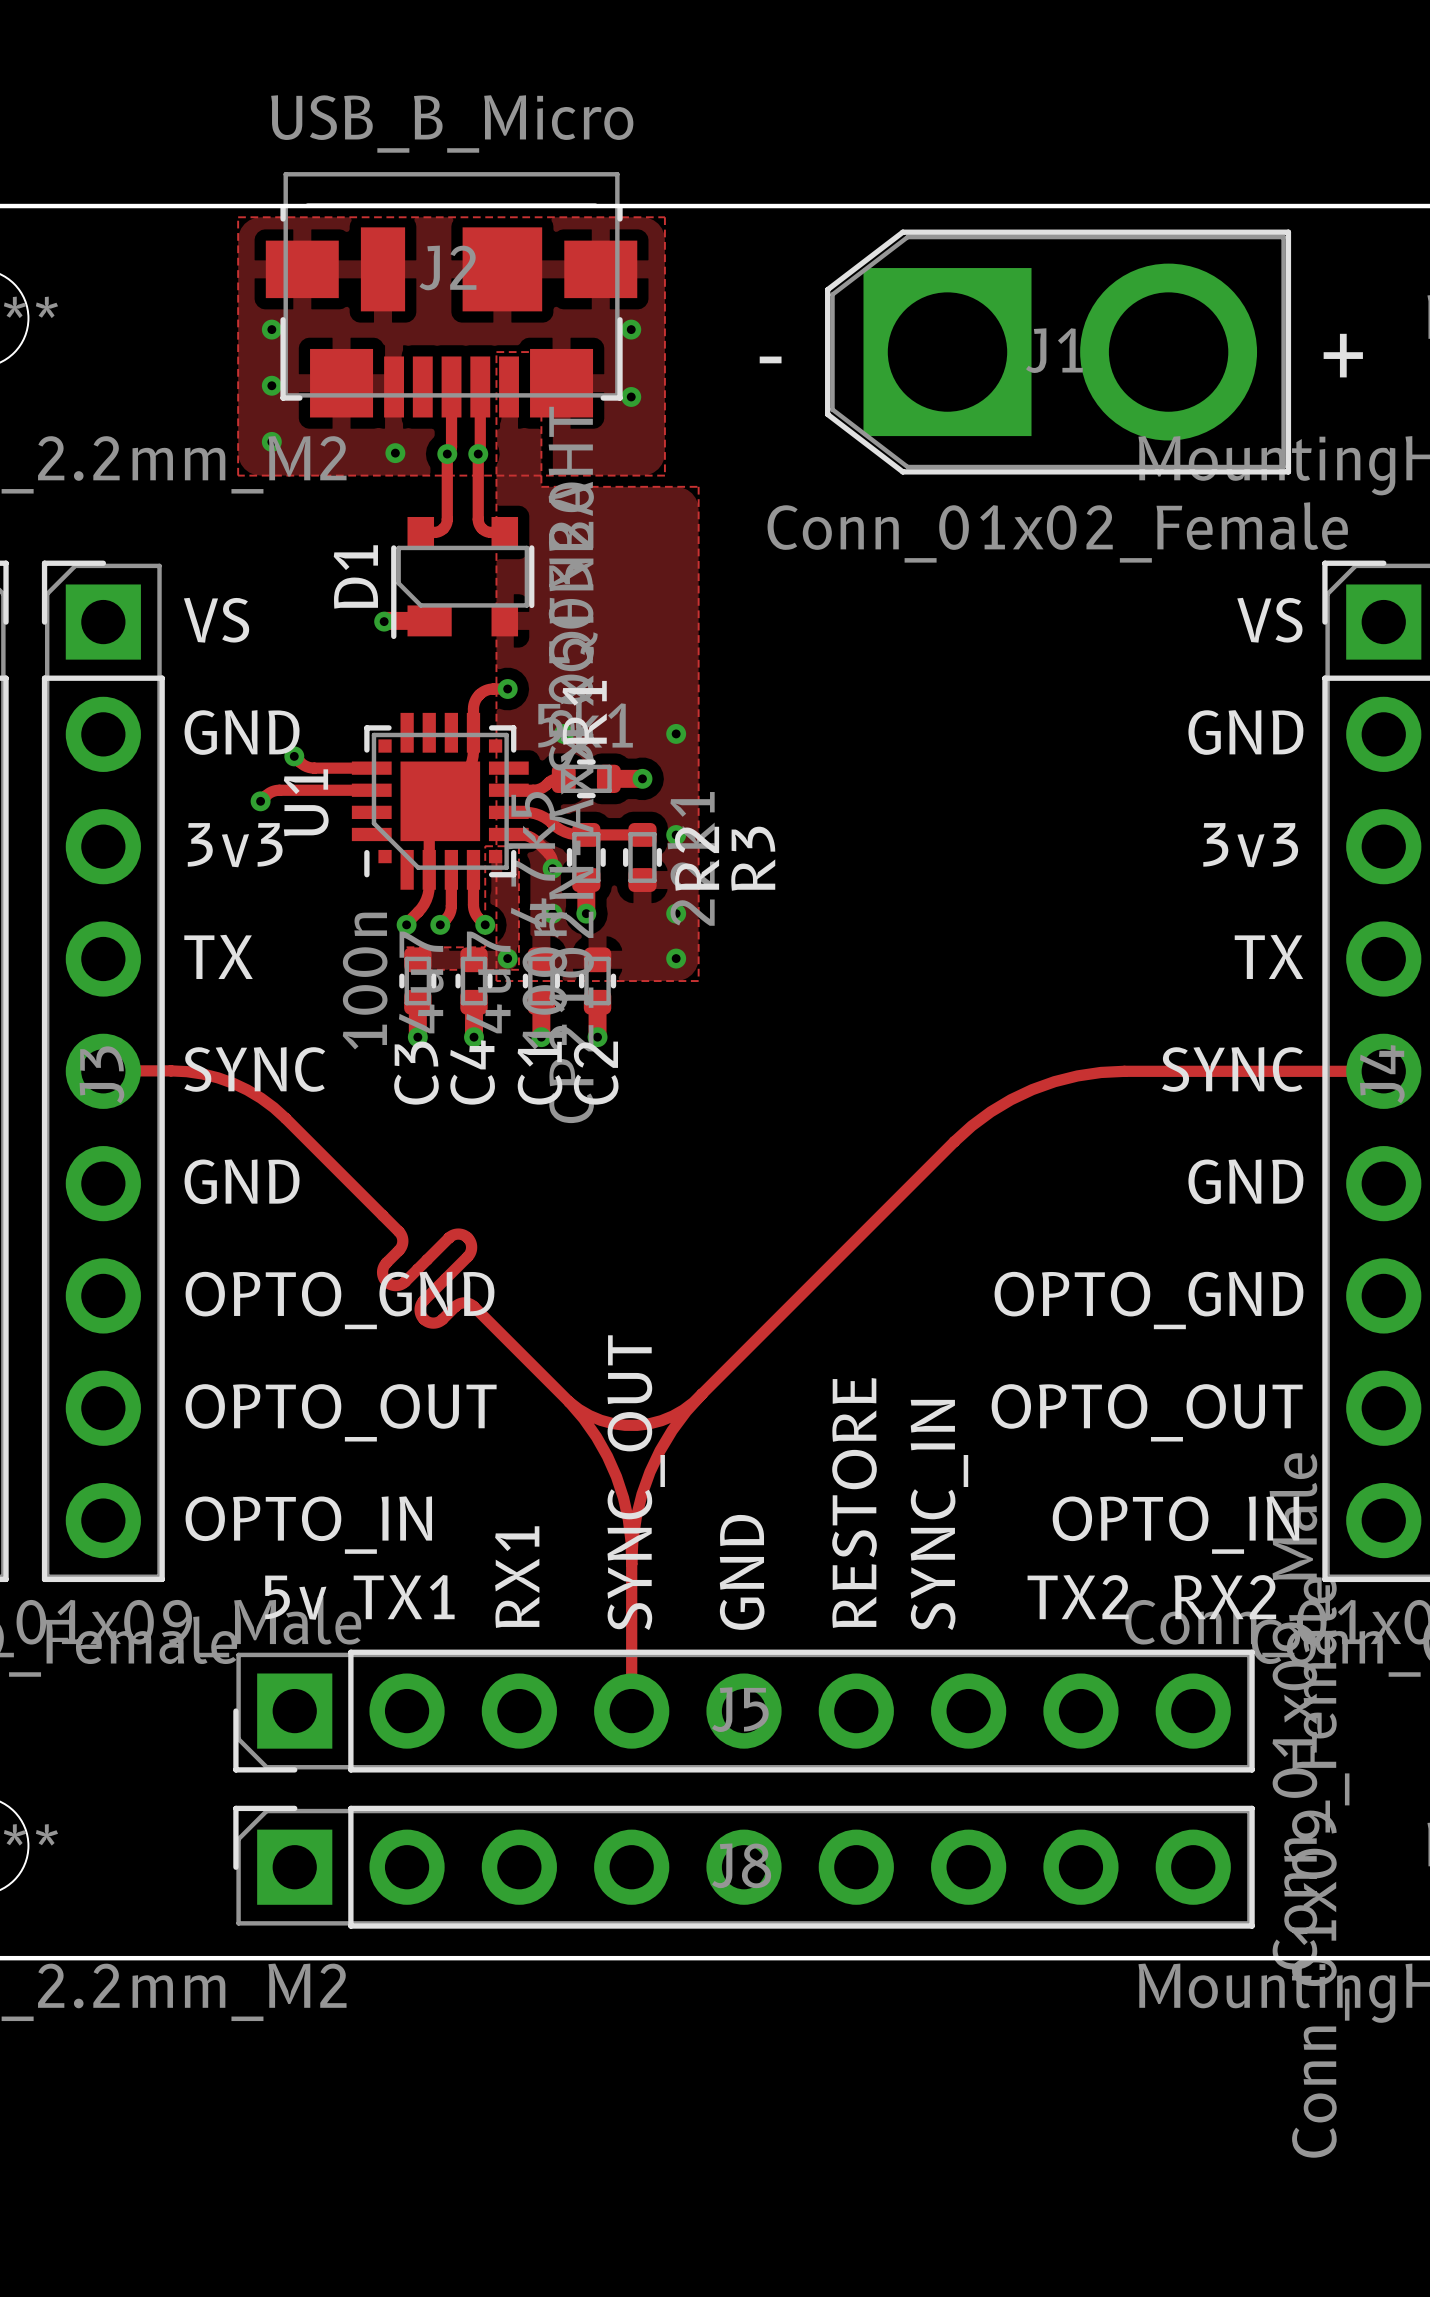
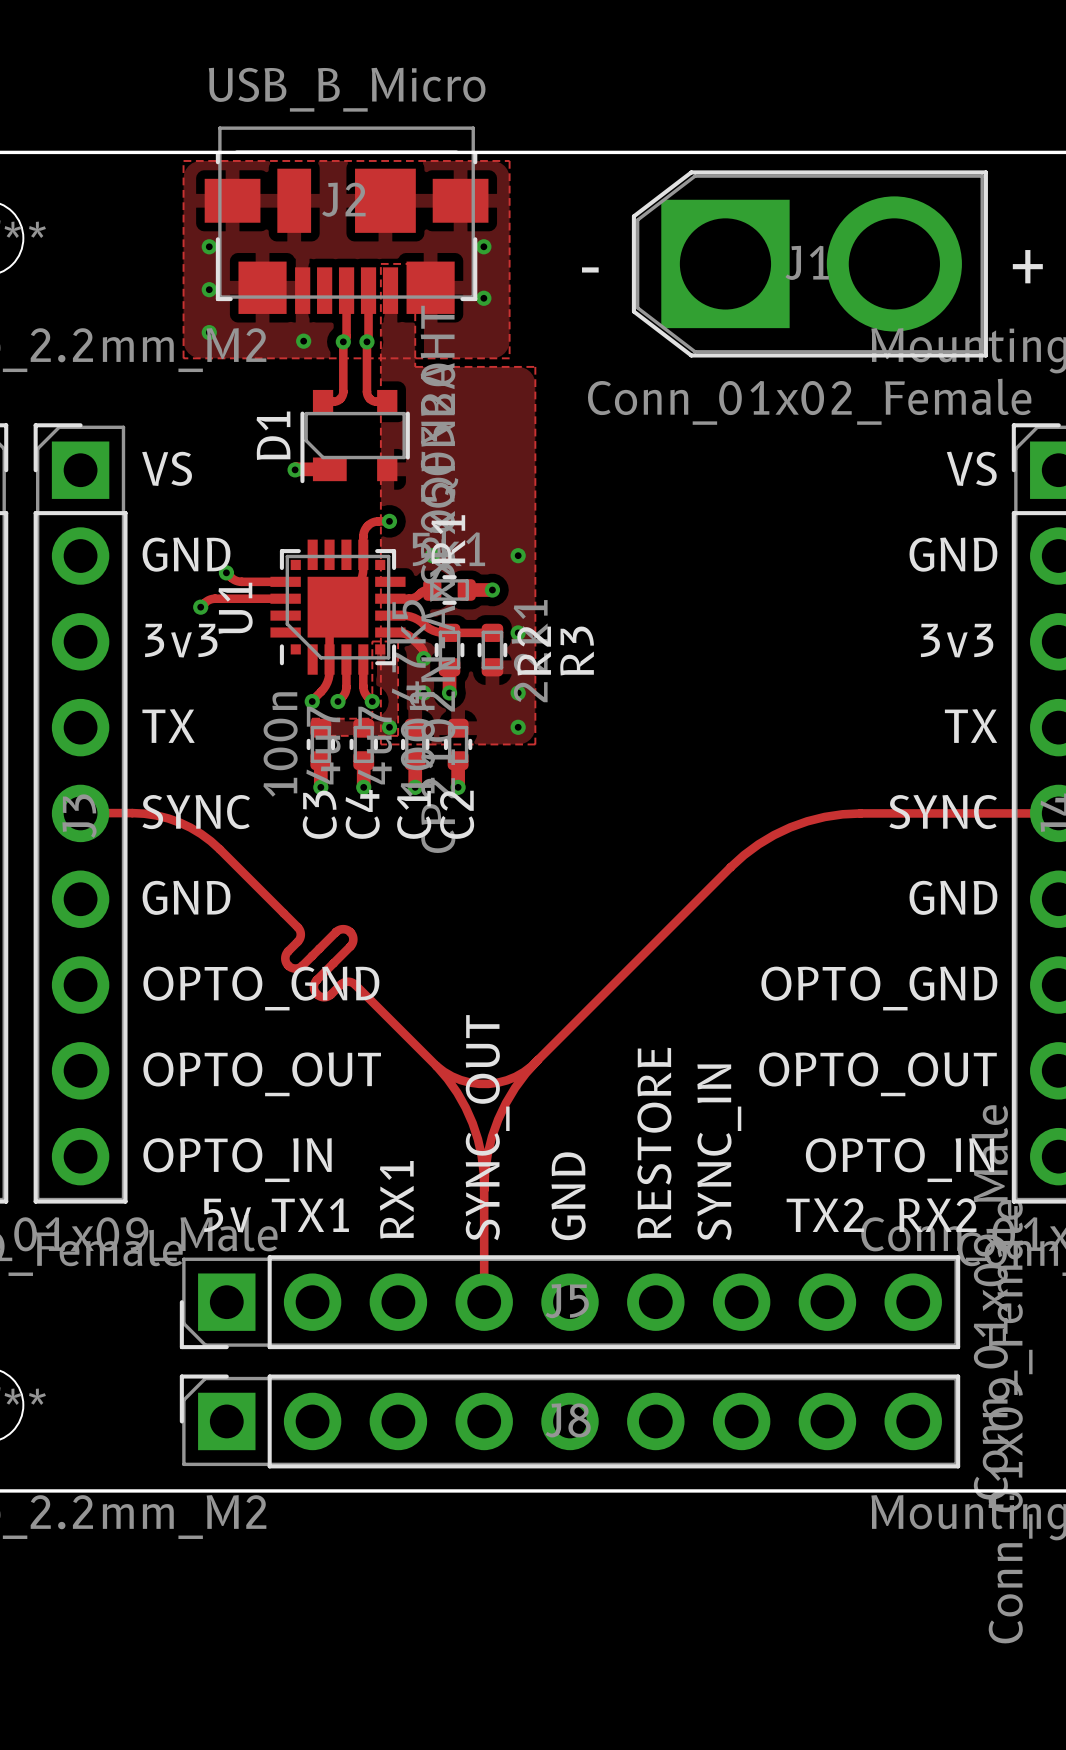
track: (387, 1220) (399, 1232) (402, 1239) (400, 1248) (383, 1268) (384, 1278) (392, 1285) (404, 1282) (452, 1235) (462, 1234) (470, 1242) (471, 1248) (468, 1255) (422, 1302) (420, 1311) (423, 1319) (431, 1323) (439, 1321) (461, 1303) (467, 1303) (474, 1306) -> (297, 927) (300, 933) (299, 938) (285, 957) (287, 964) (293, 968) (301, 966) (338, 930) (347, 930) (353, 937) (351, 945) (315, 981) (314, 988) (316, 994) (321, 996) (327, 996) (341, 983) (347, 981) (354, 983) (363, 993)

